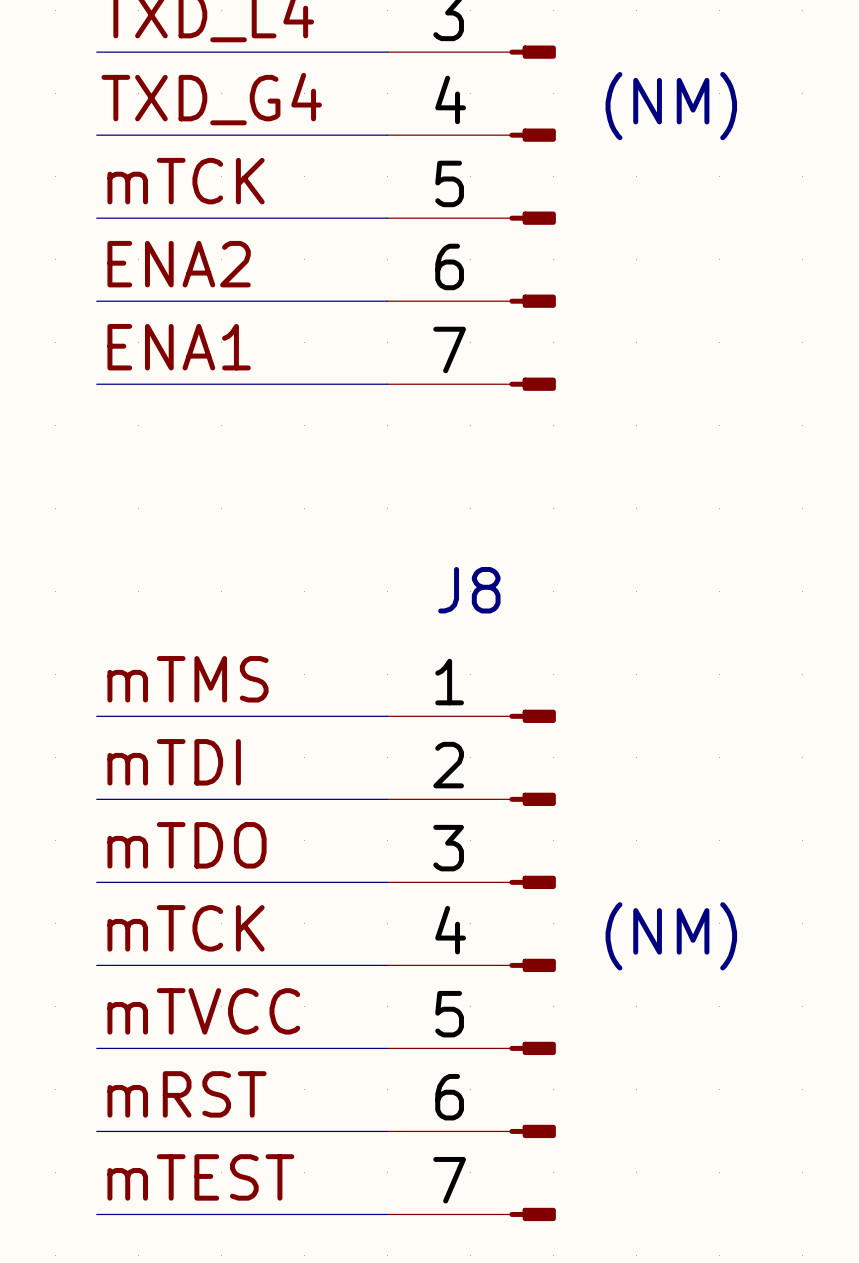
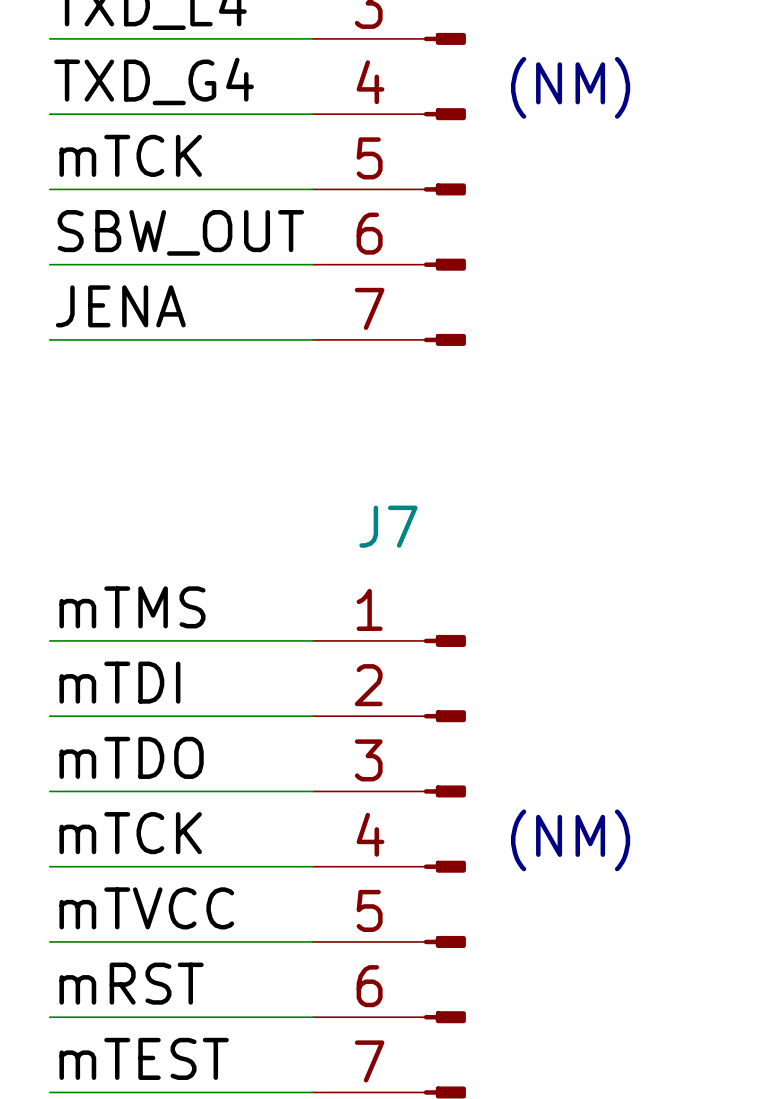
label: ENA2 (179, 264) -> SBW_OUT (180, 232)
label: ENA1 (179, 347) -> JENA (120, 306)
J8 name: J8 (469, 590) -> J7 (388, 526)

